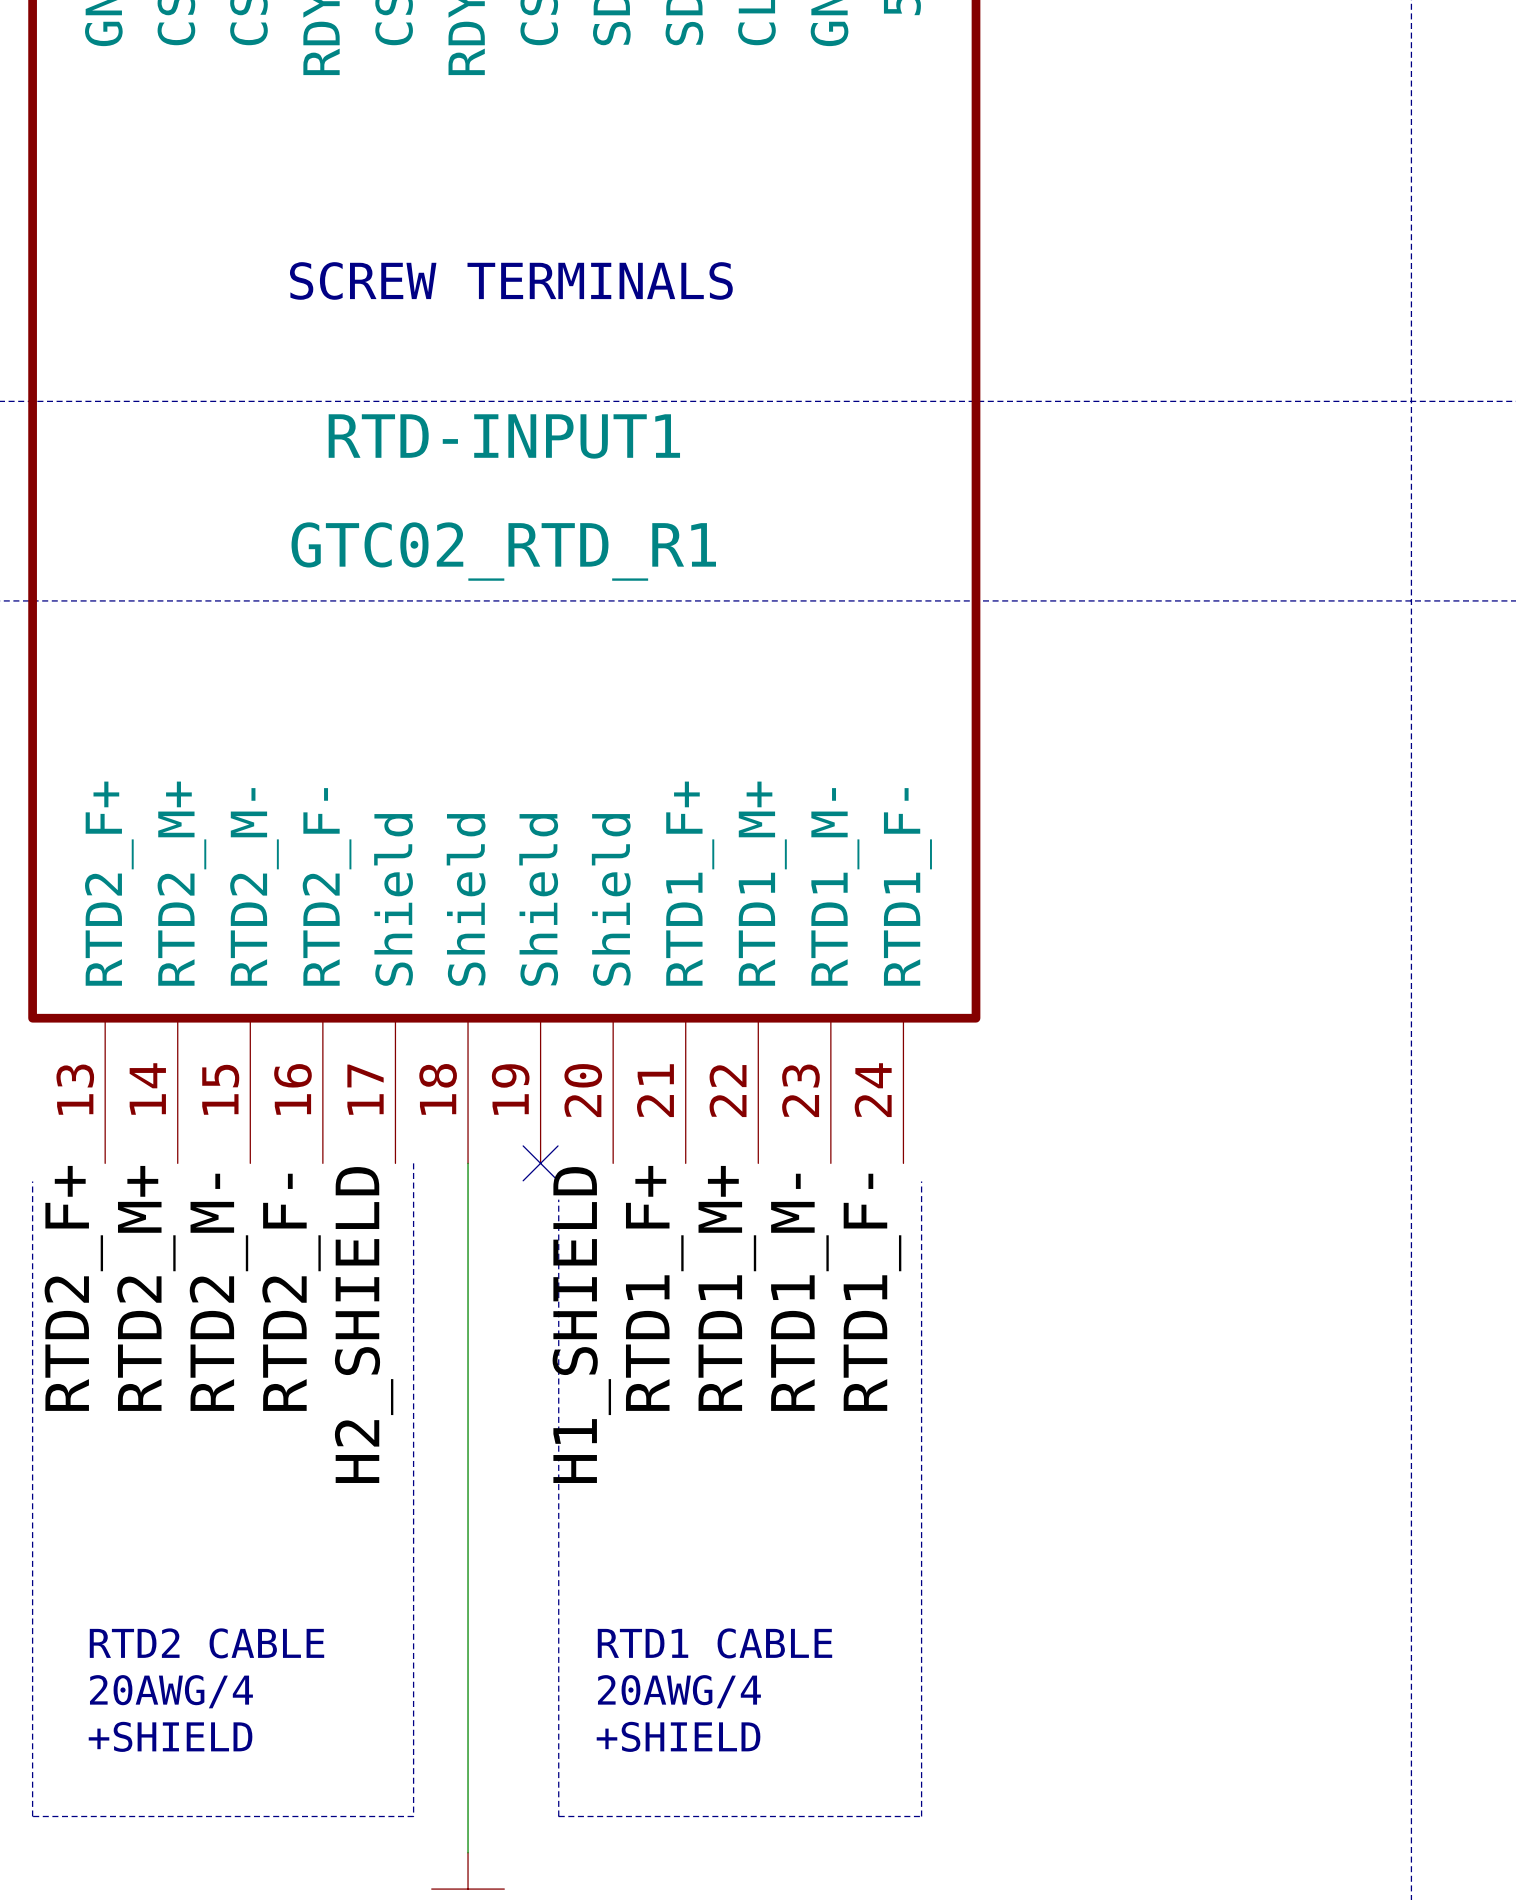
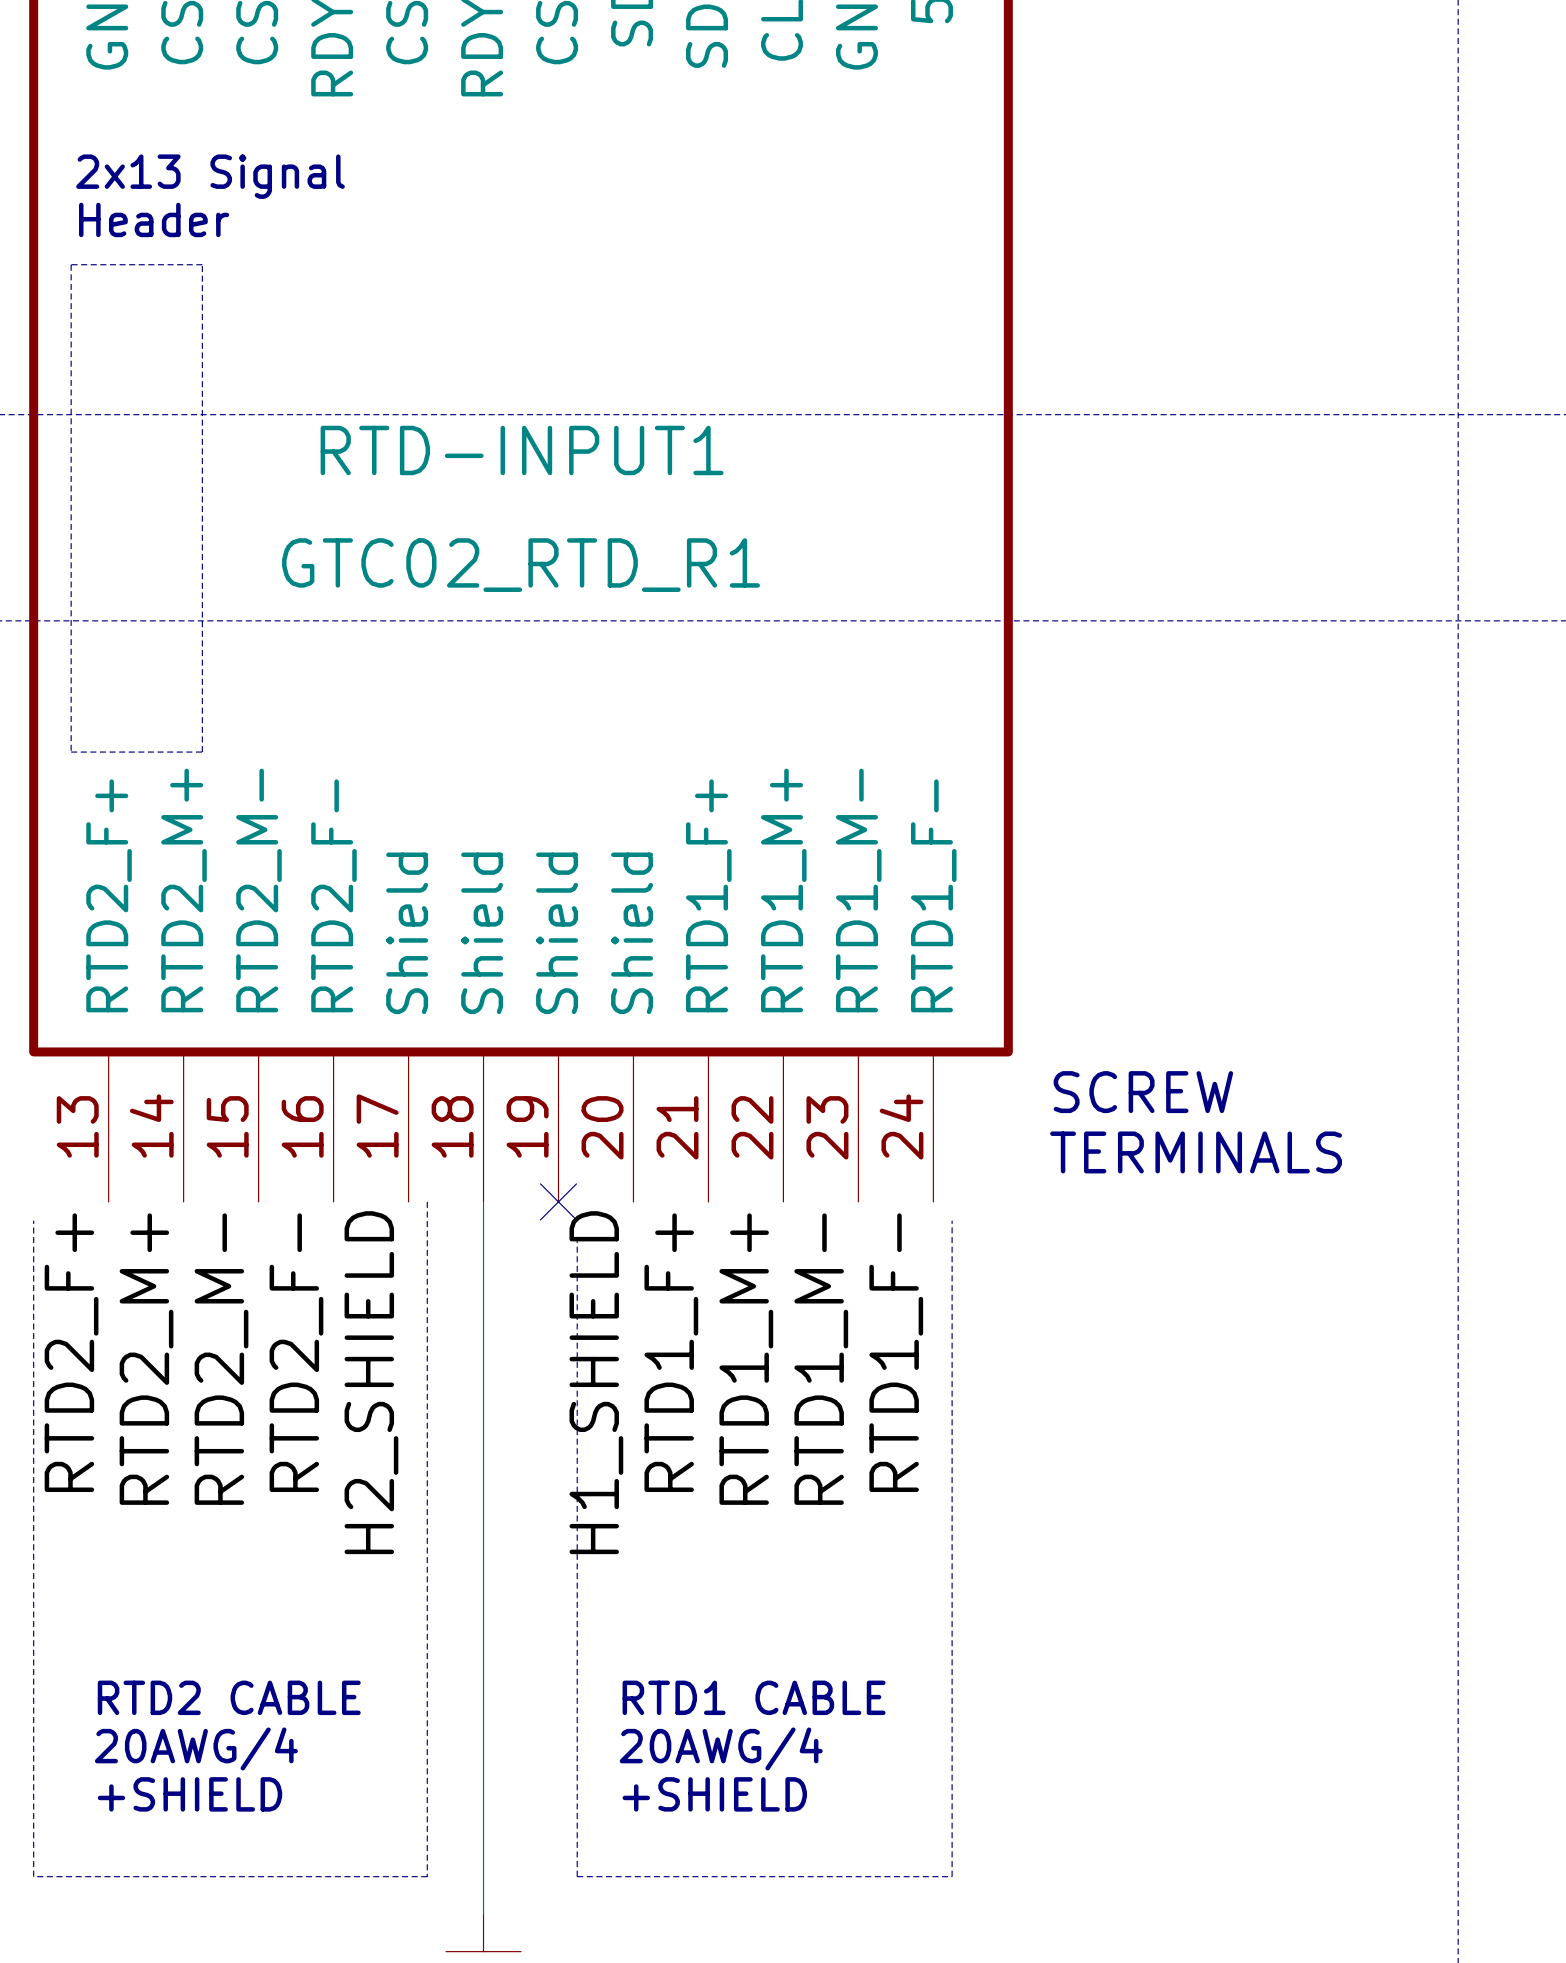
text: none -> 2x13 Signal (210, 176)
text: none -> Header (154, 219)
line: none -> (71, 264) (71, 752) (202, 752) (202, 264) (71, 264)
text: SCREW TERMINALS (511, 280) -> none
text: none -> SCREW (1143, 1092)
text: none -> TERMINALS (1196, 1152)

